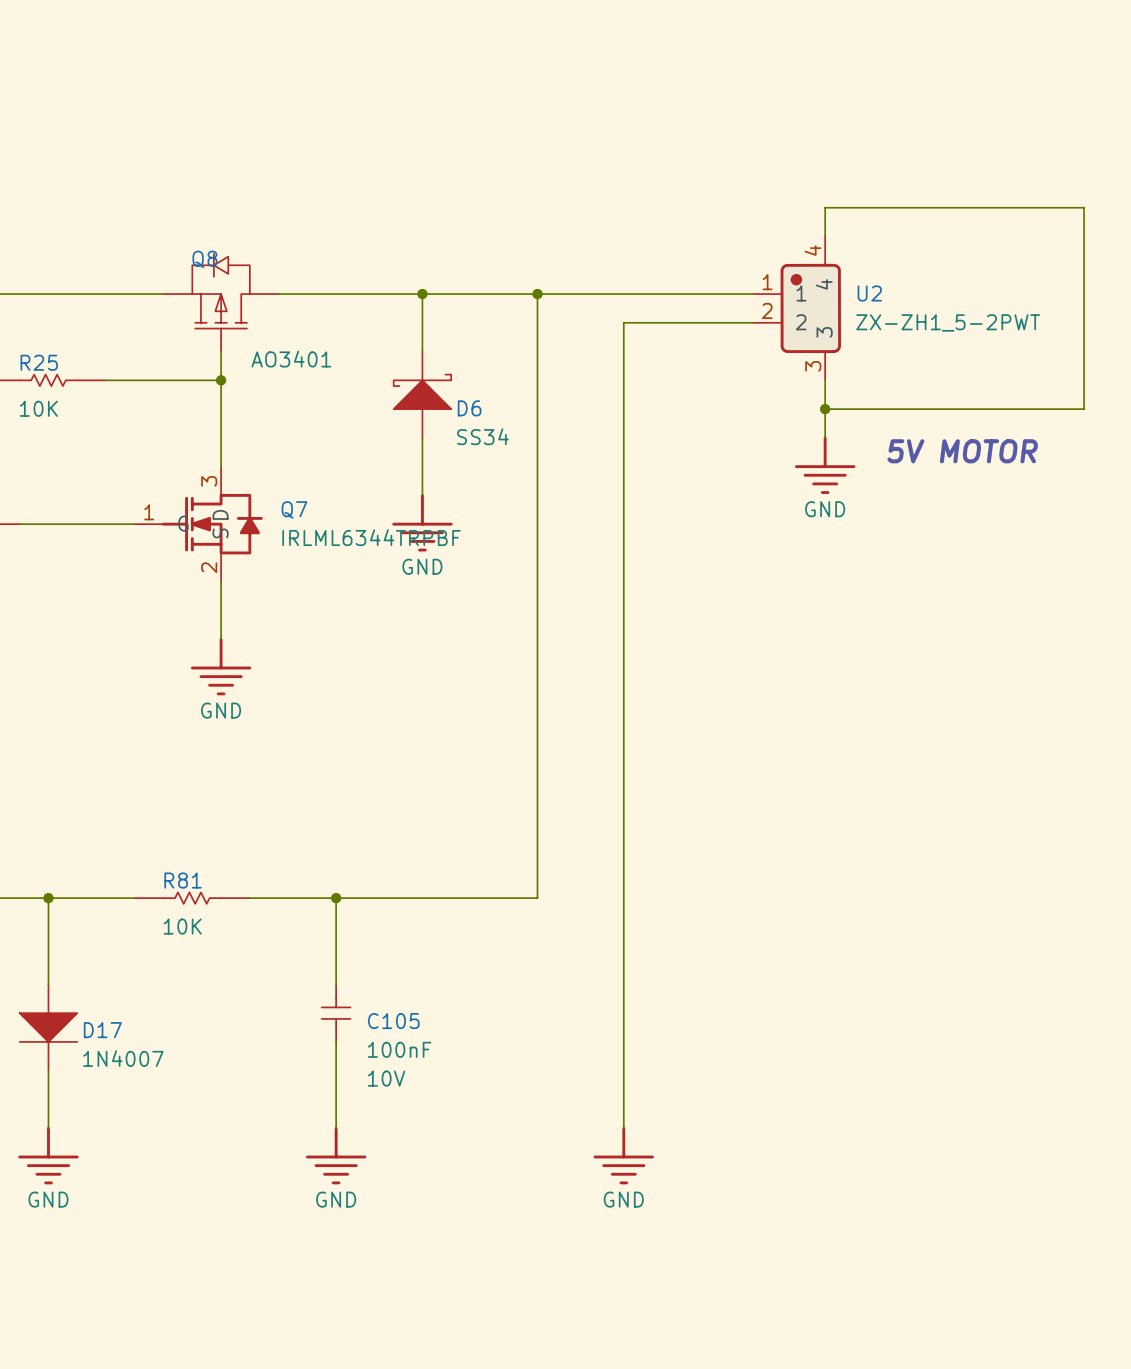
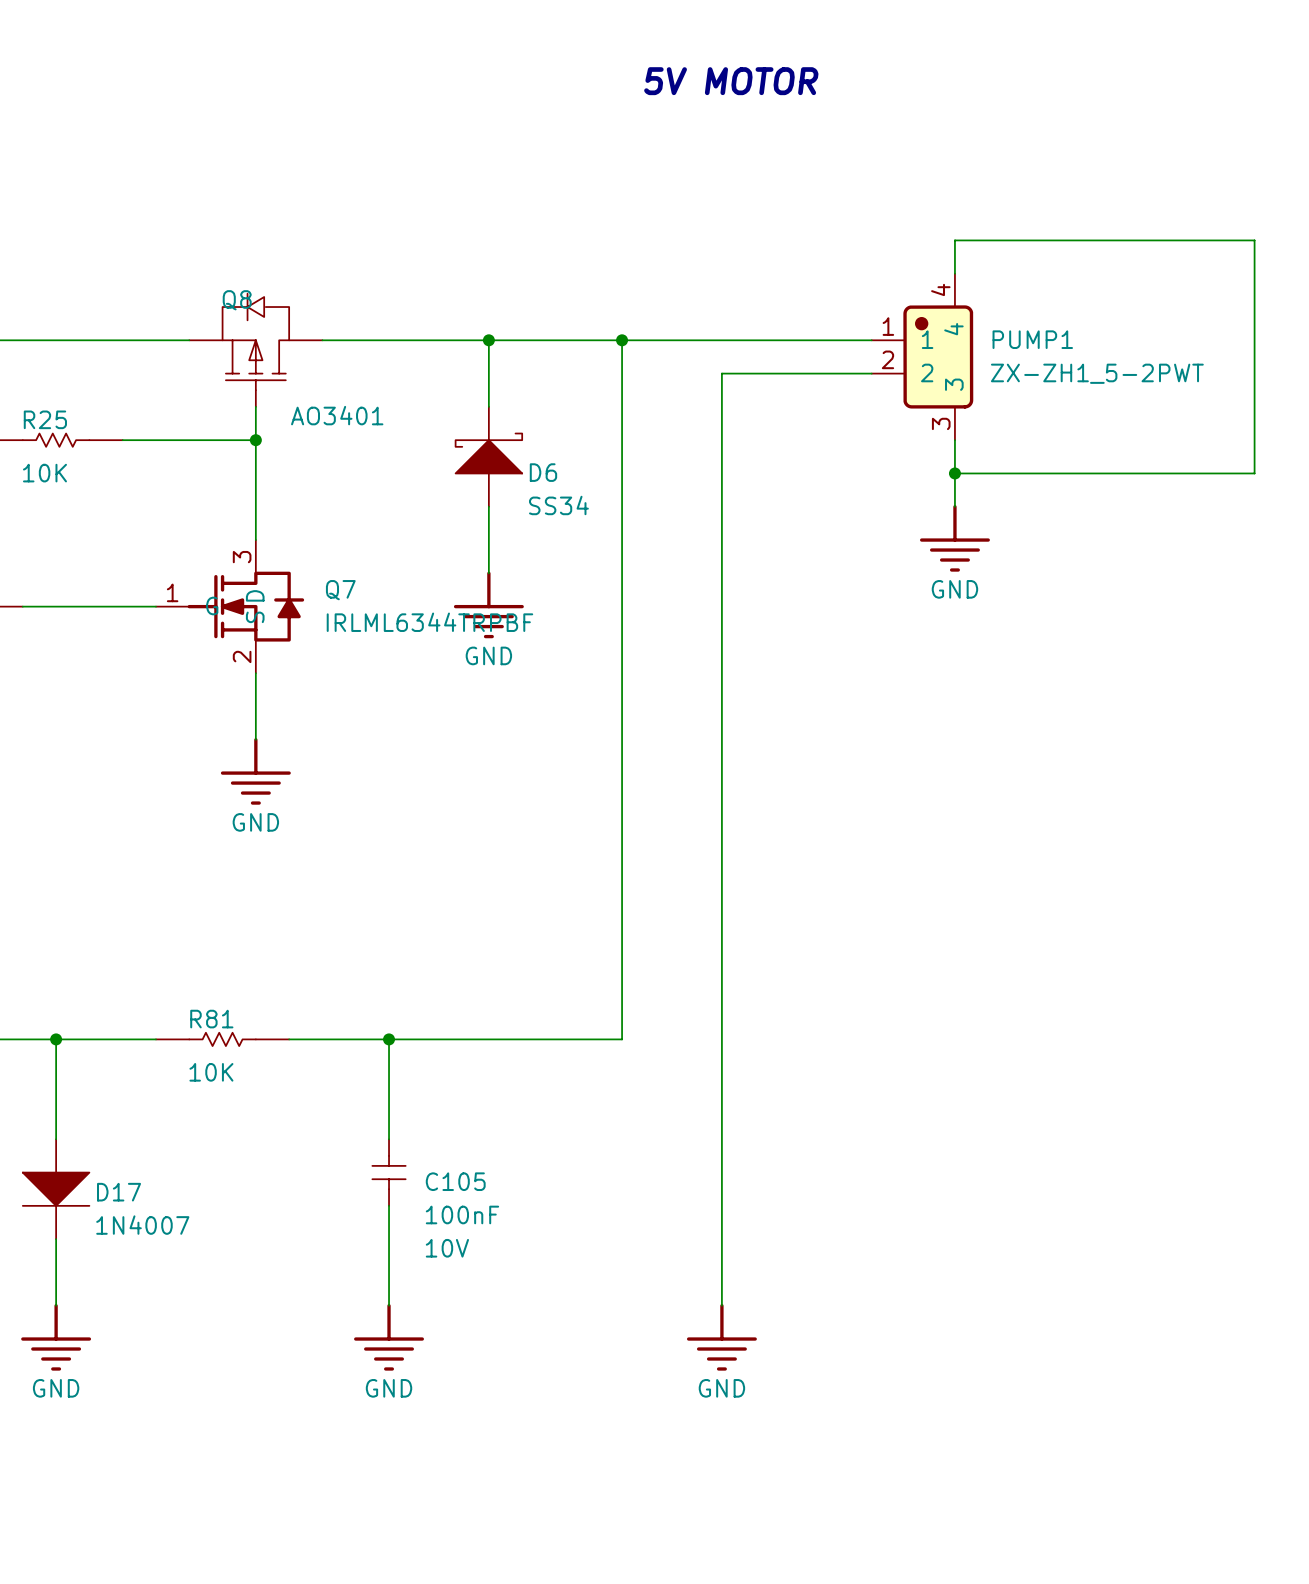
text: none -> 5V MOTOR (731, 81)
U2 name: U2 (869, 293) -> PUMP1 (1032, 339)
text: 5V MOTOR (962, 451) -> none

